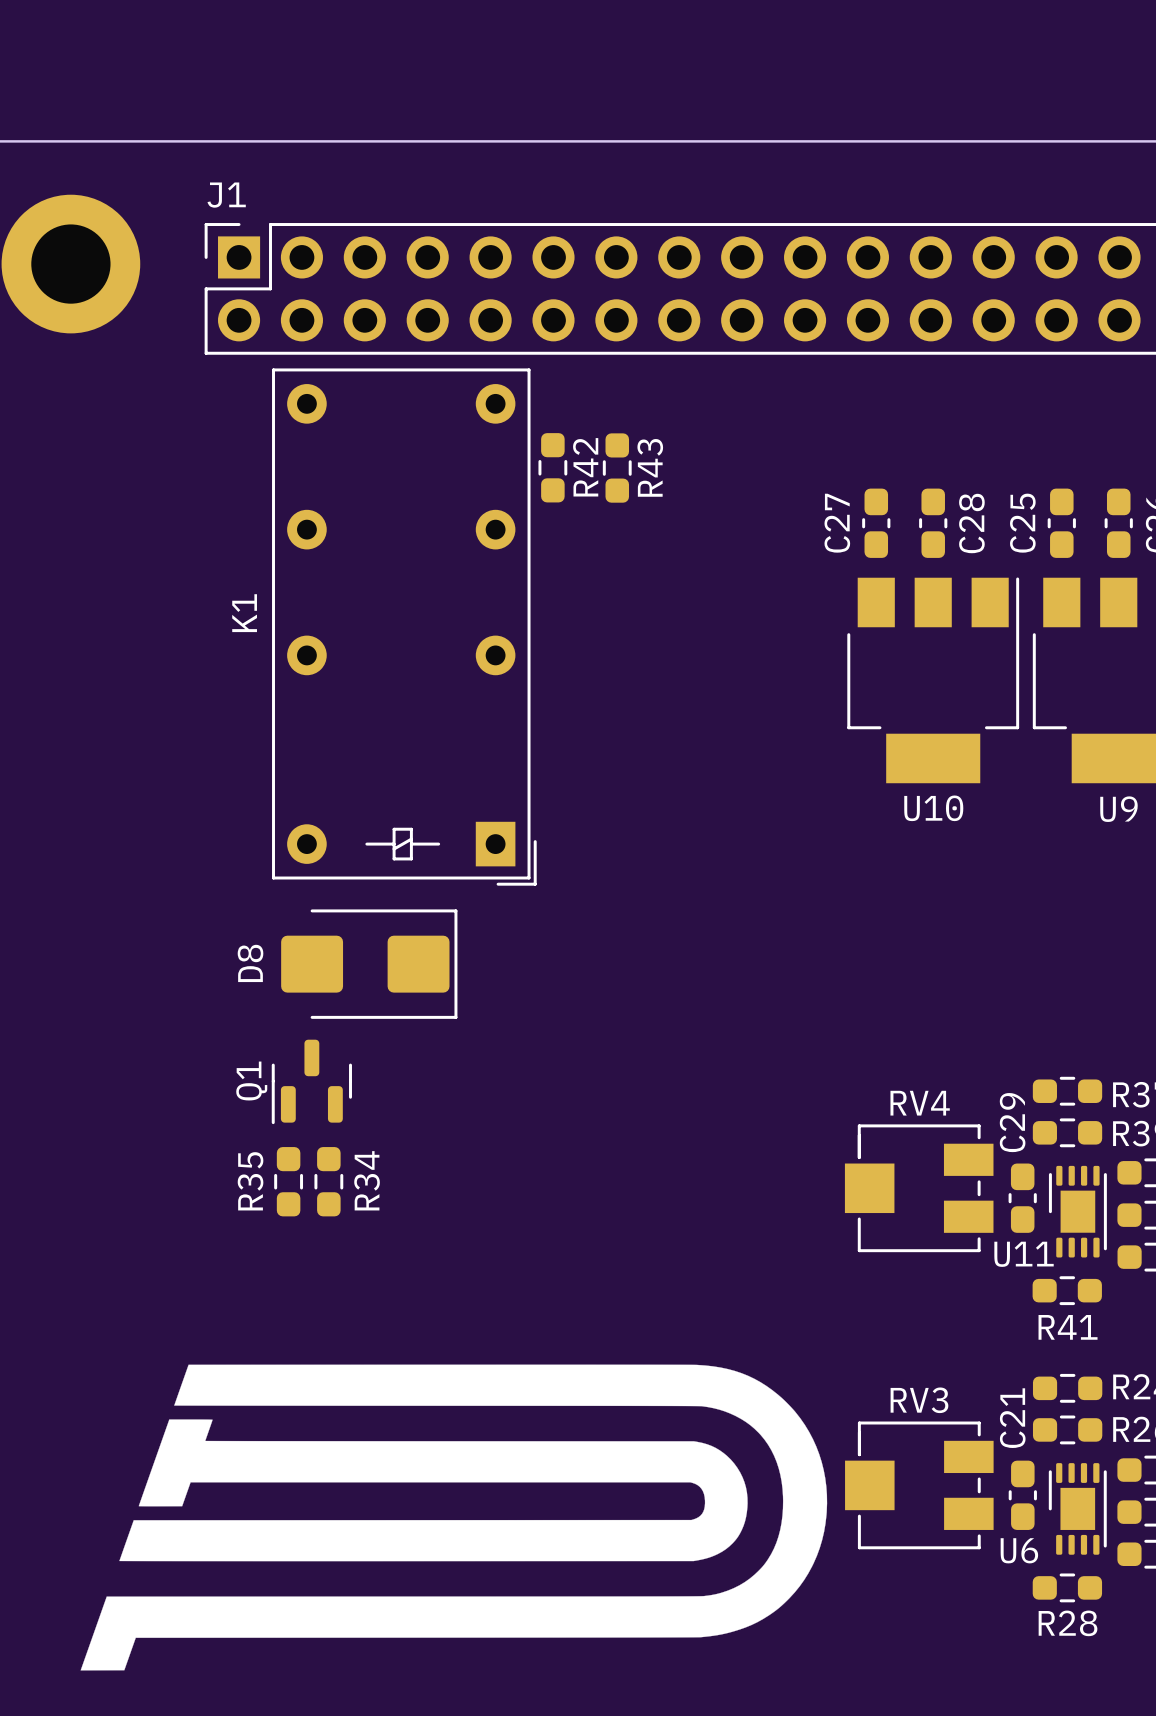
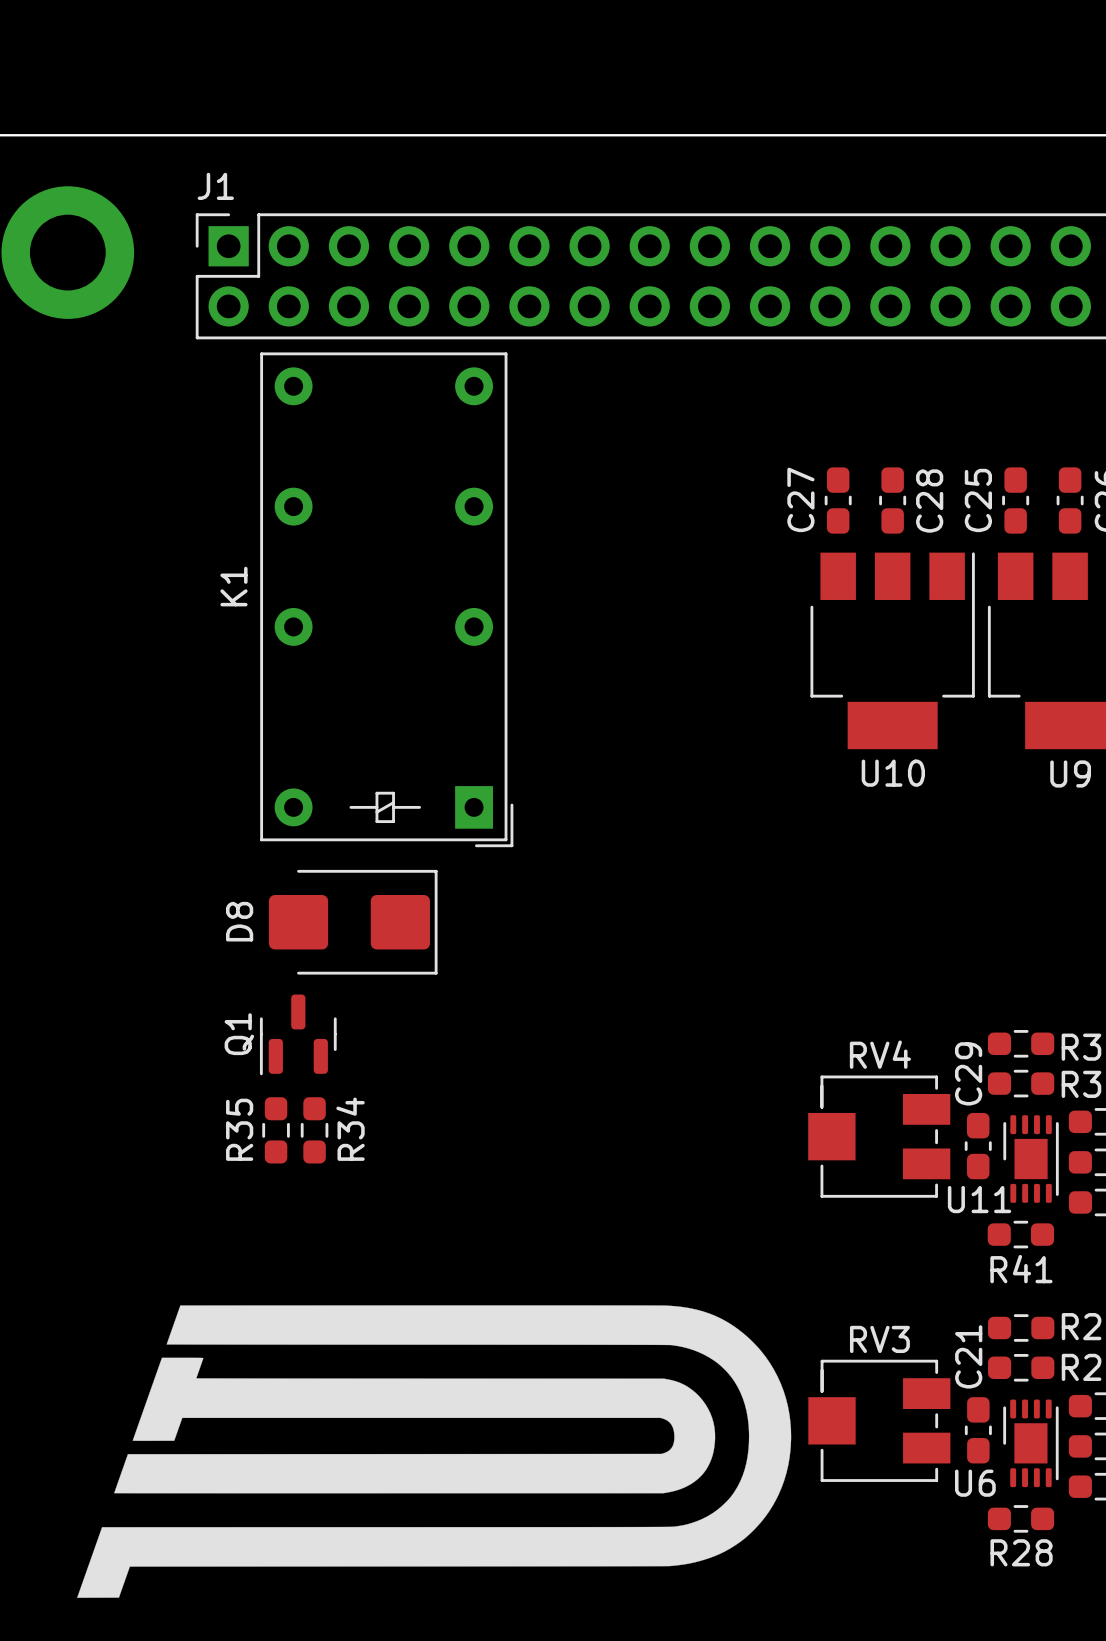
R42: (552, 467) -> none
R43: (617, 468) -> none

